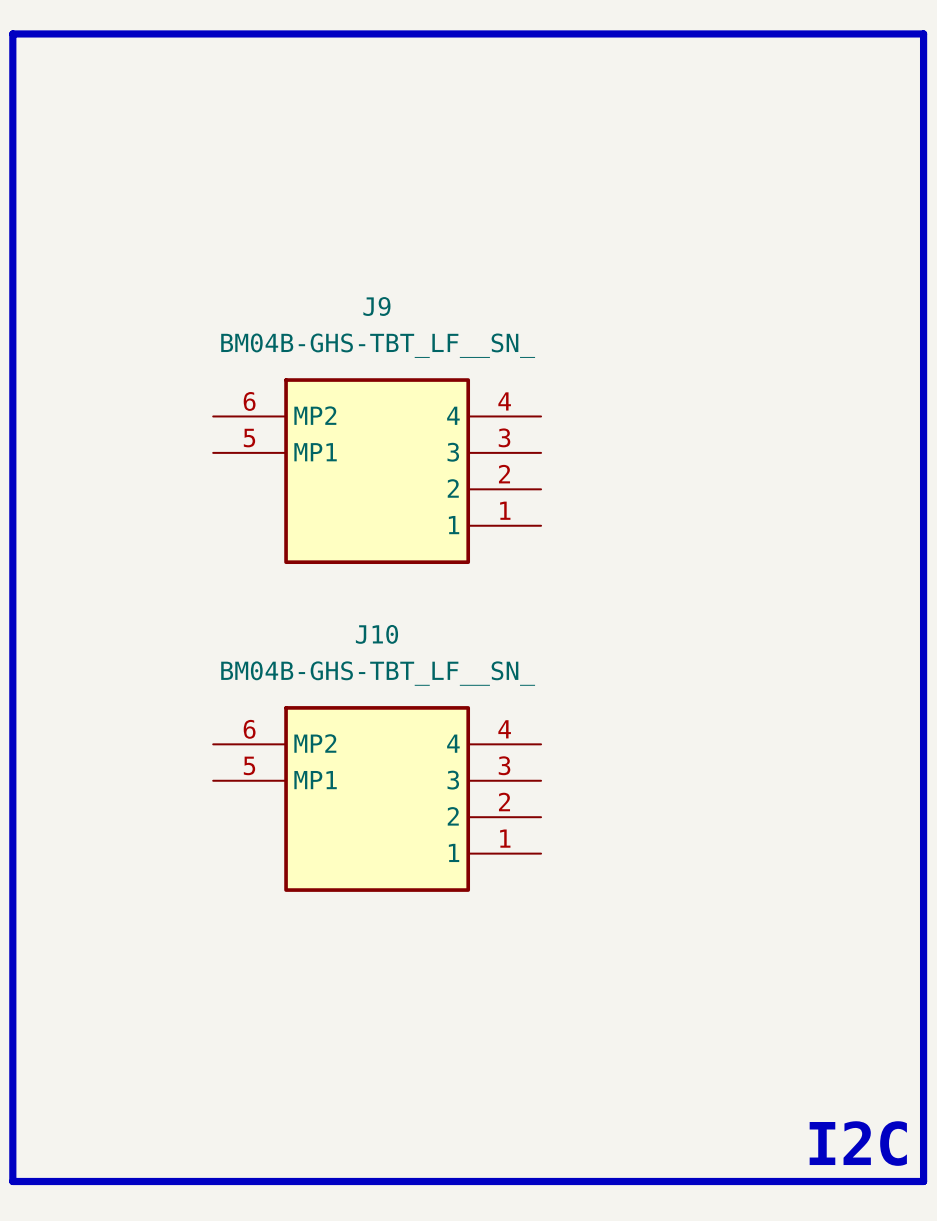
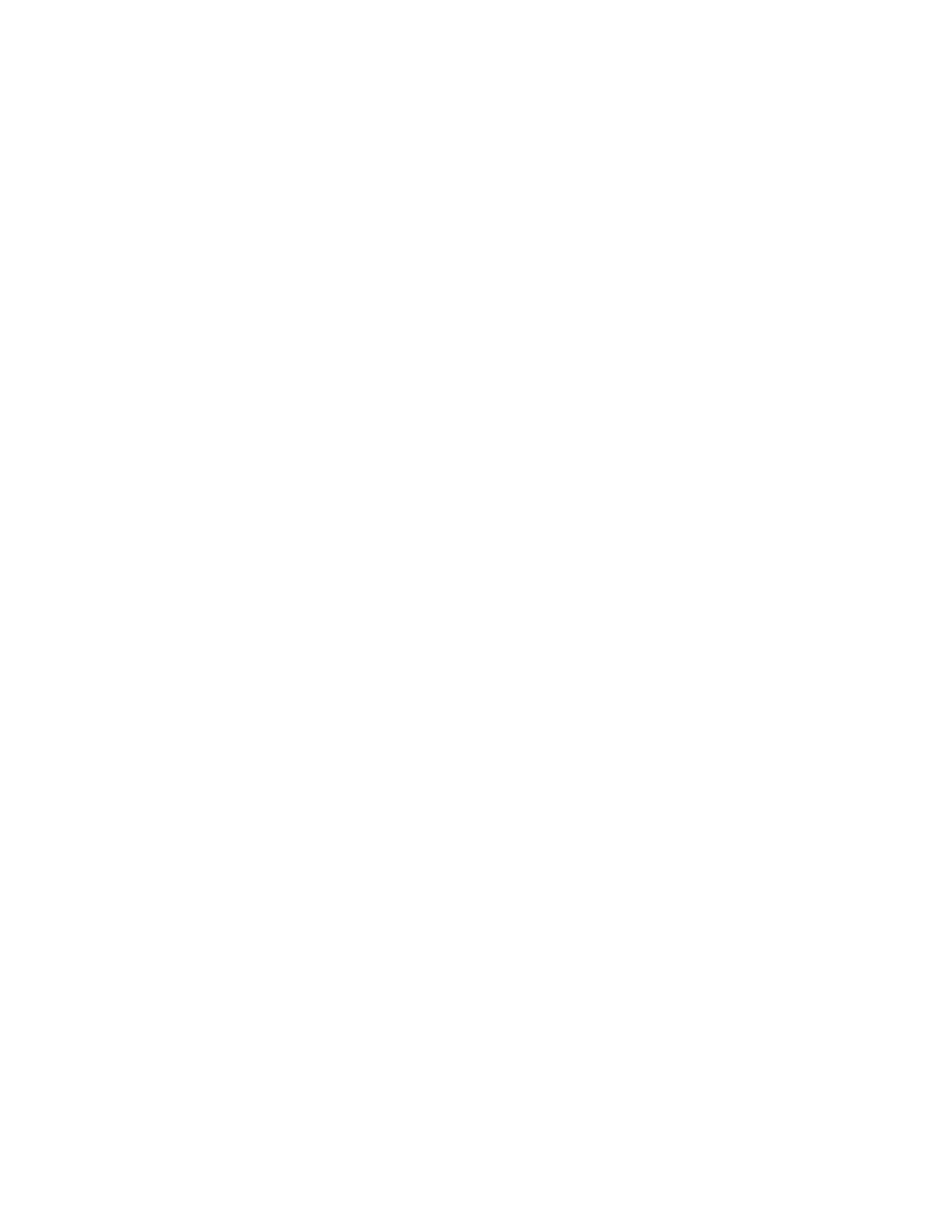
line: (12, 33) (923, 33) (923, 1181) (12, 1181) (12, 33) -> none
J9: BM04B-GHS-TBT_LF__SN_ (377, 471) -> none
J10: BM04B-GHS-TBT_LF__SN_ (377, 798) -> none
text: I2C (858, 1143) -> none

